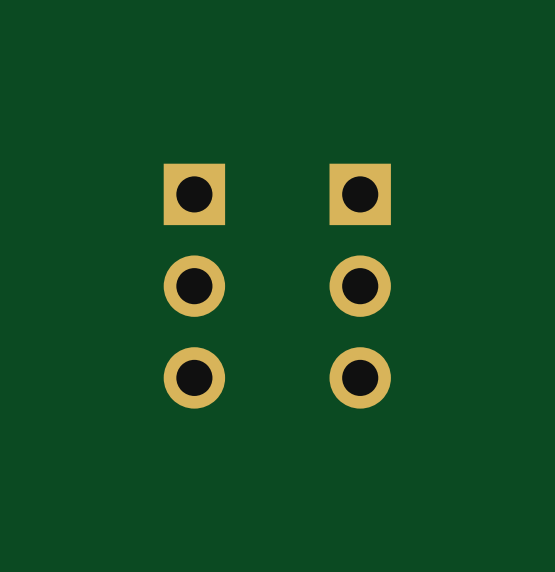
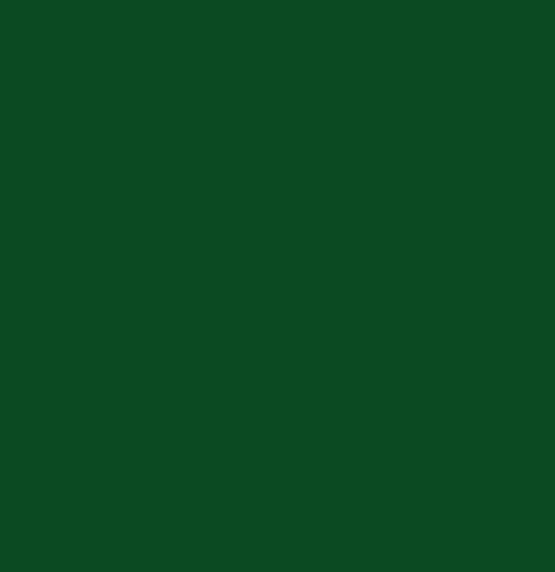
part: (194, 286) -> none
part: (360, 286) -> none

